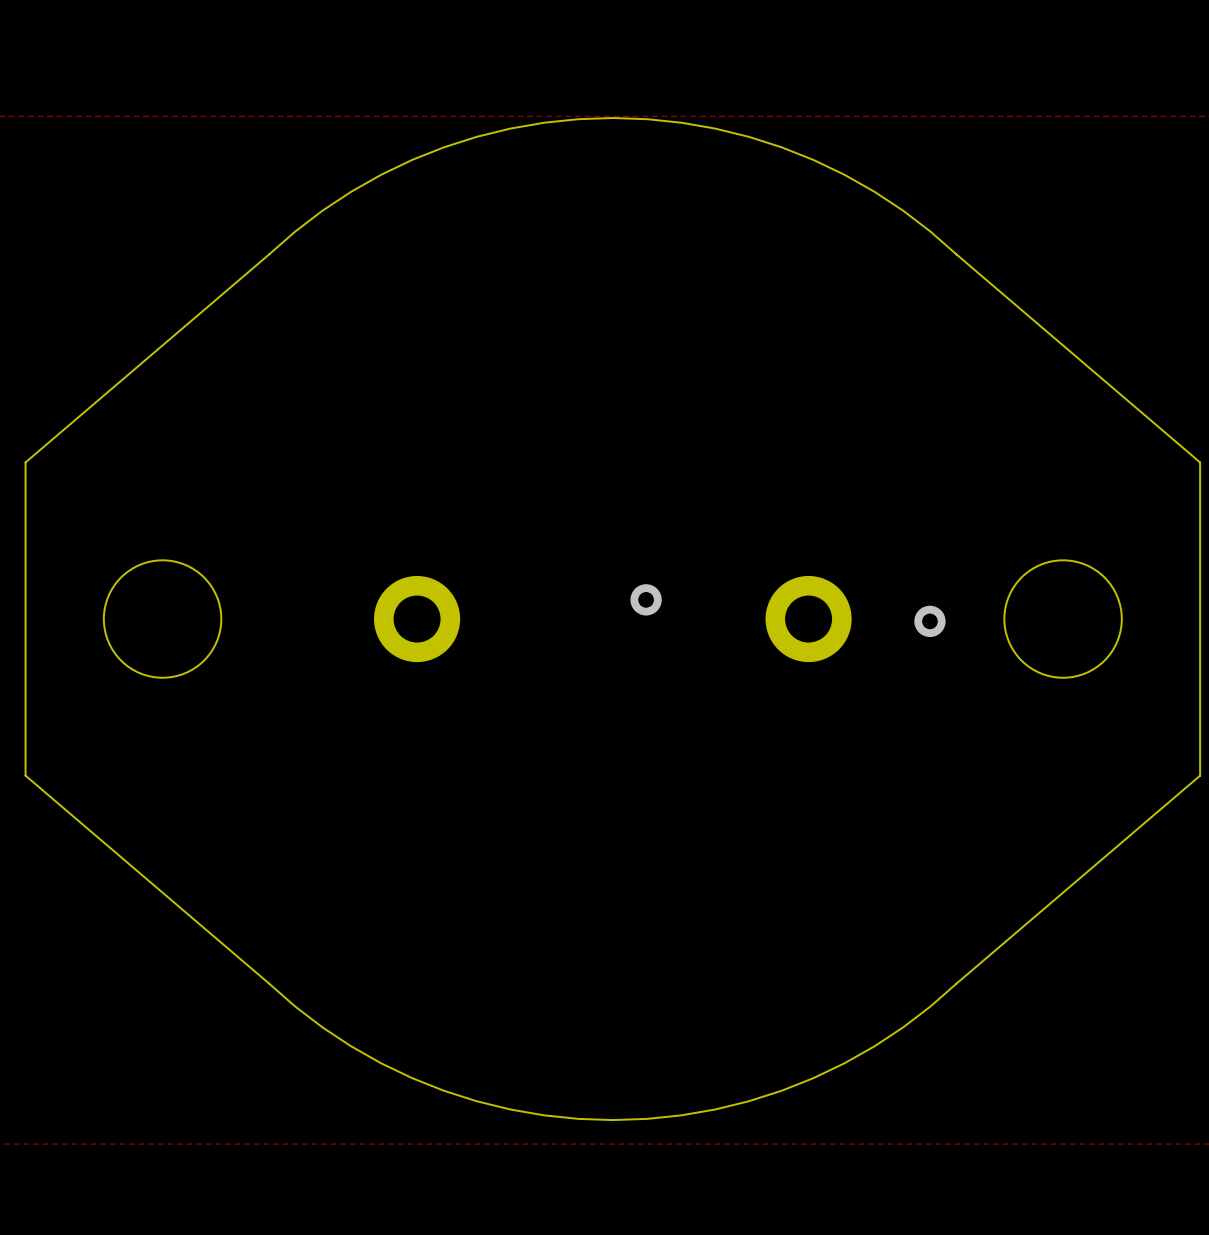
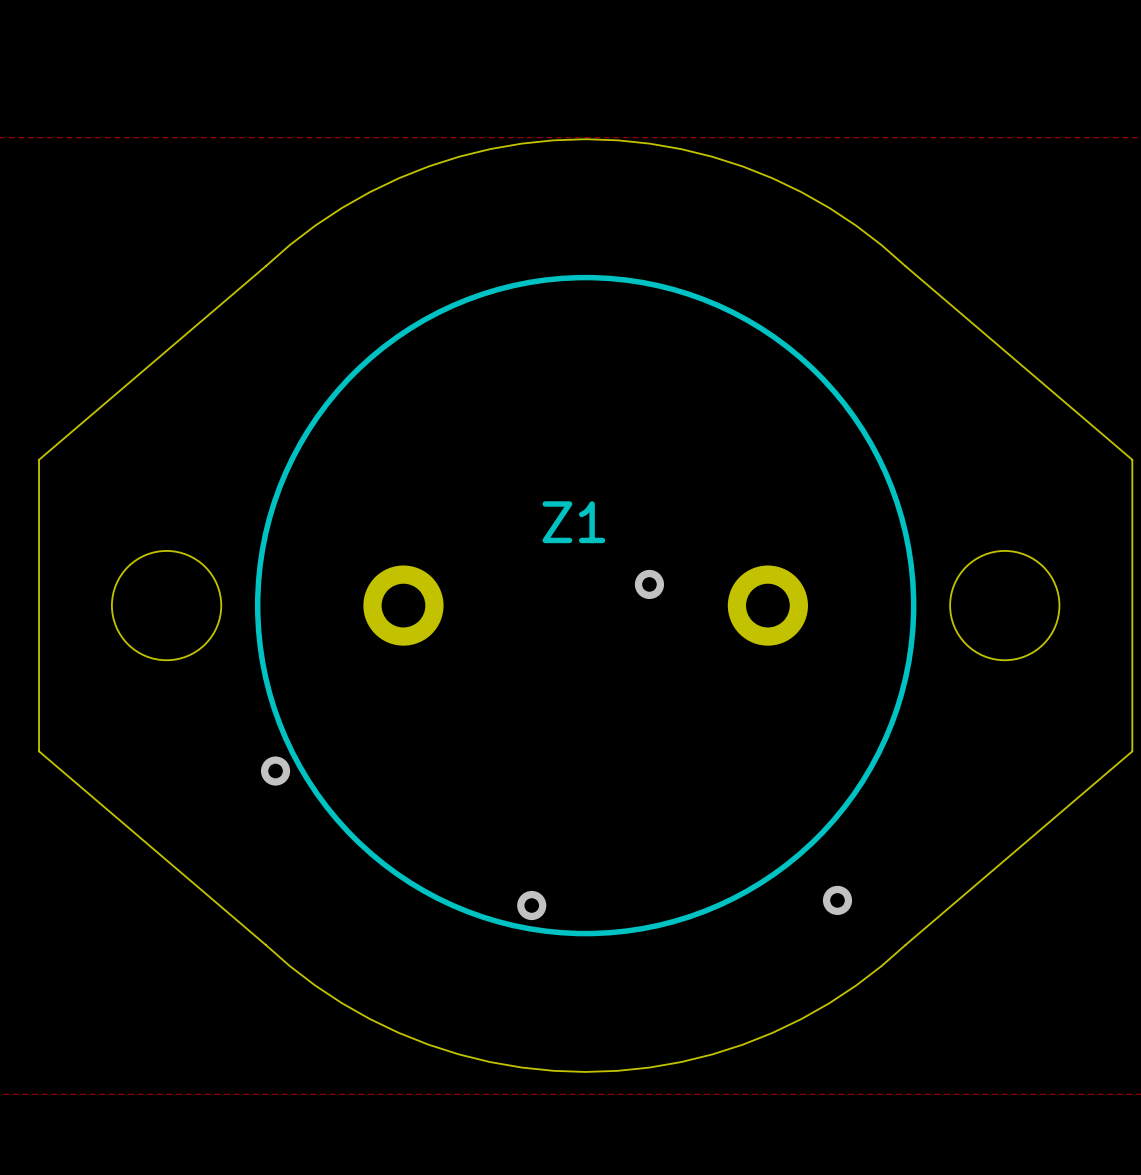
via position: (646, 599) -> (649, 584)
Z1: none -> (585, 605)
via: (929, 621) -> none
via: none -> (275, 771)
via: none -> (837, 900)
via: none -> (531, 905)

